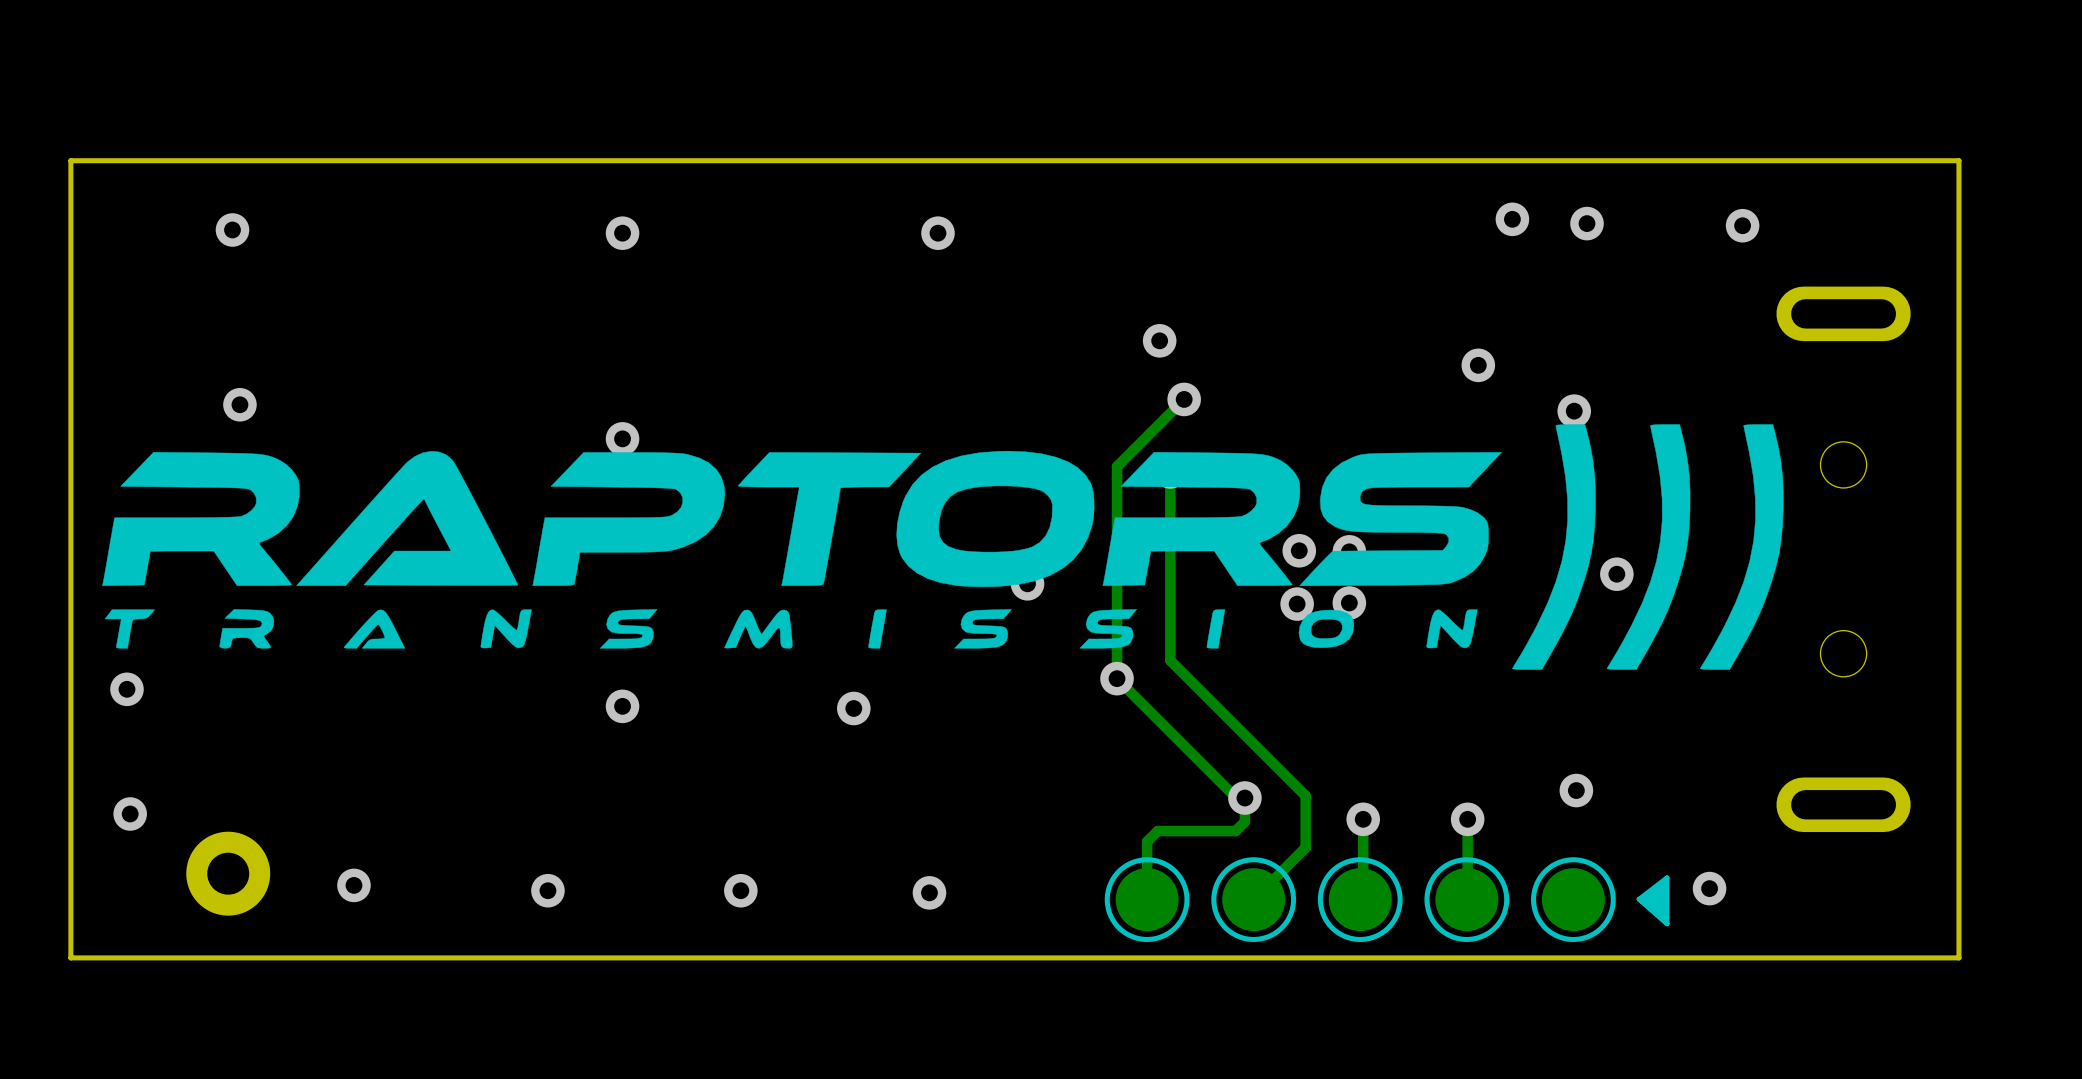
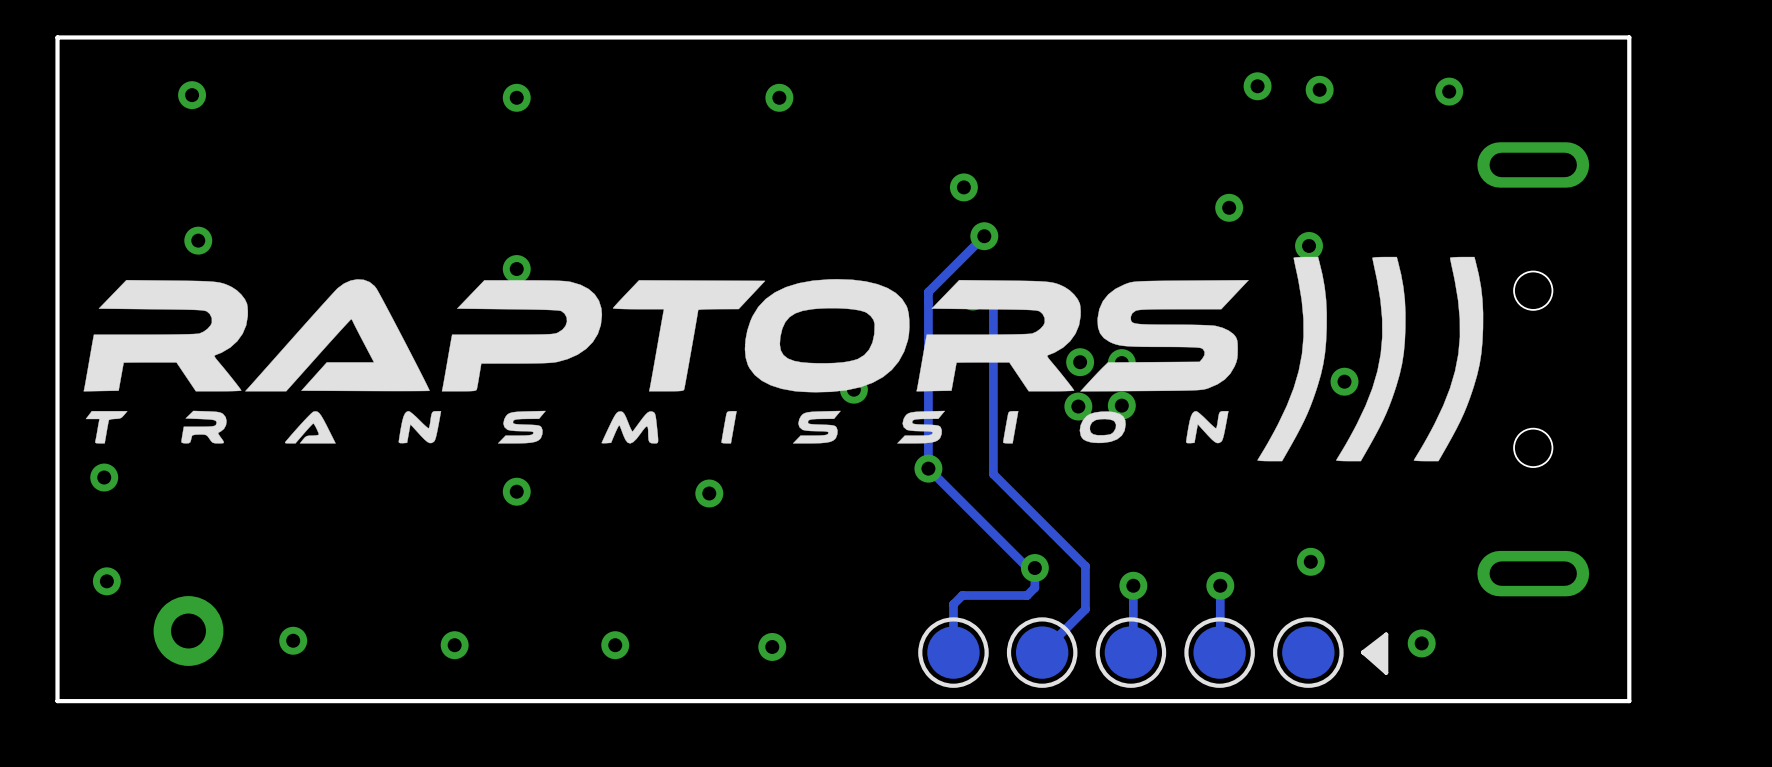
track: (1170, 471) (1170, 660) (1195, 685) -> (1007, 292) (993, 306) (993, 474)

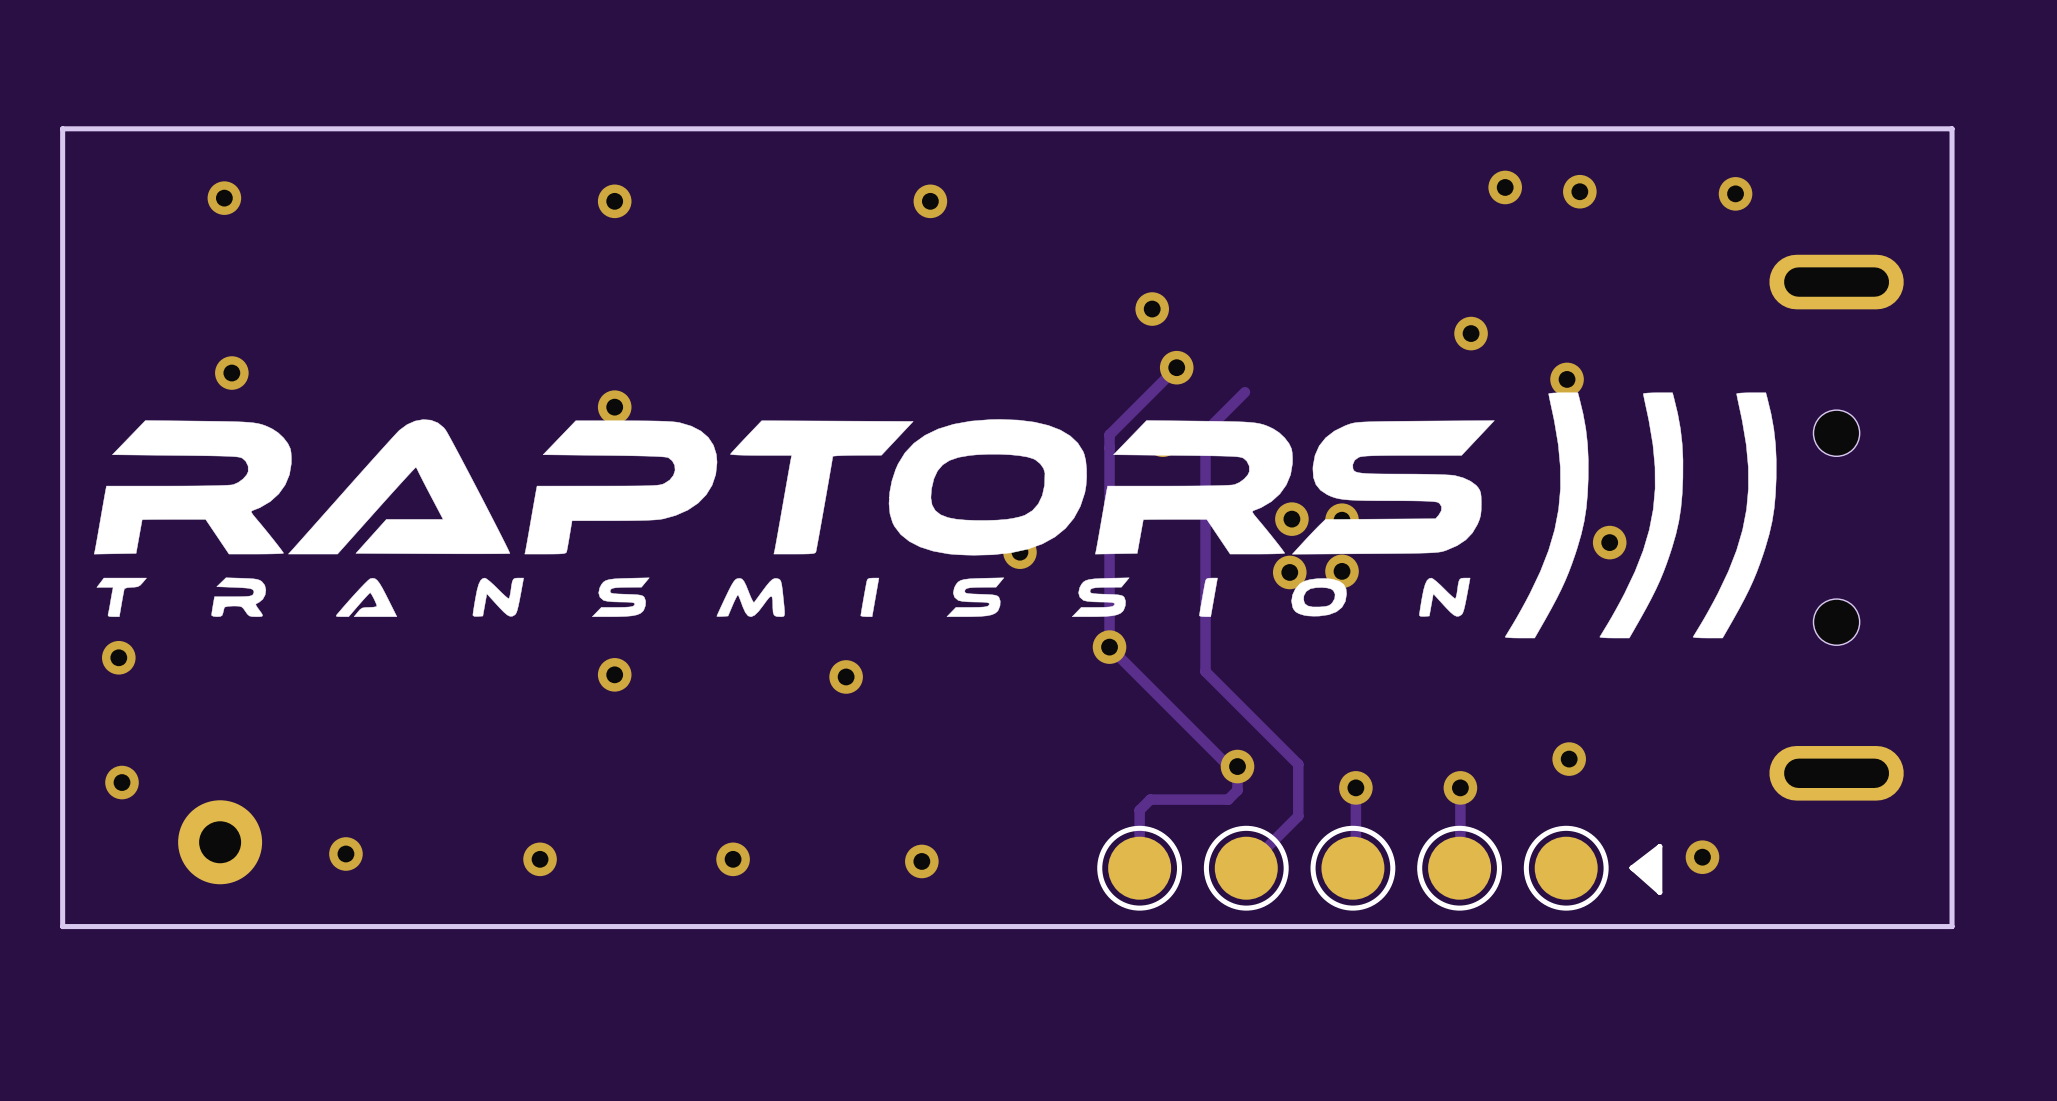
track: (1007, 292) (993, 306) (993, 474) (1008, 489) -> (1244, 392) (1205, 431) (1205, 671)

